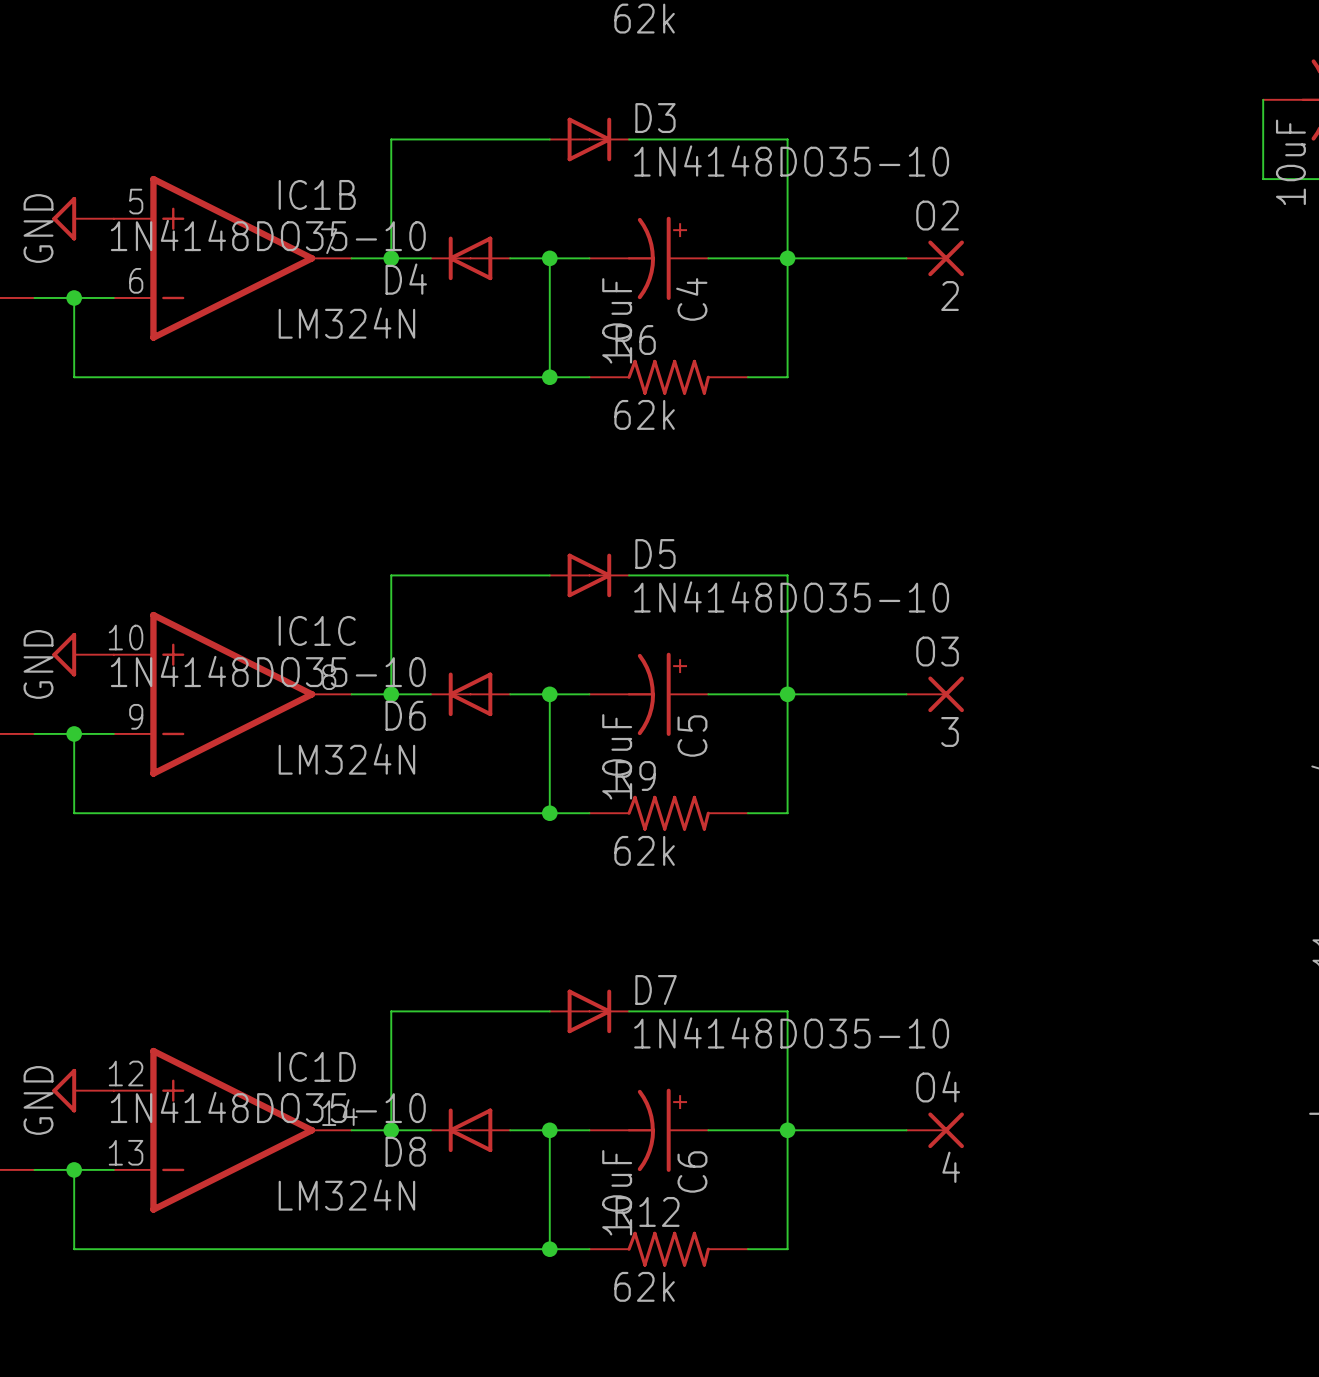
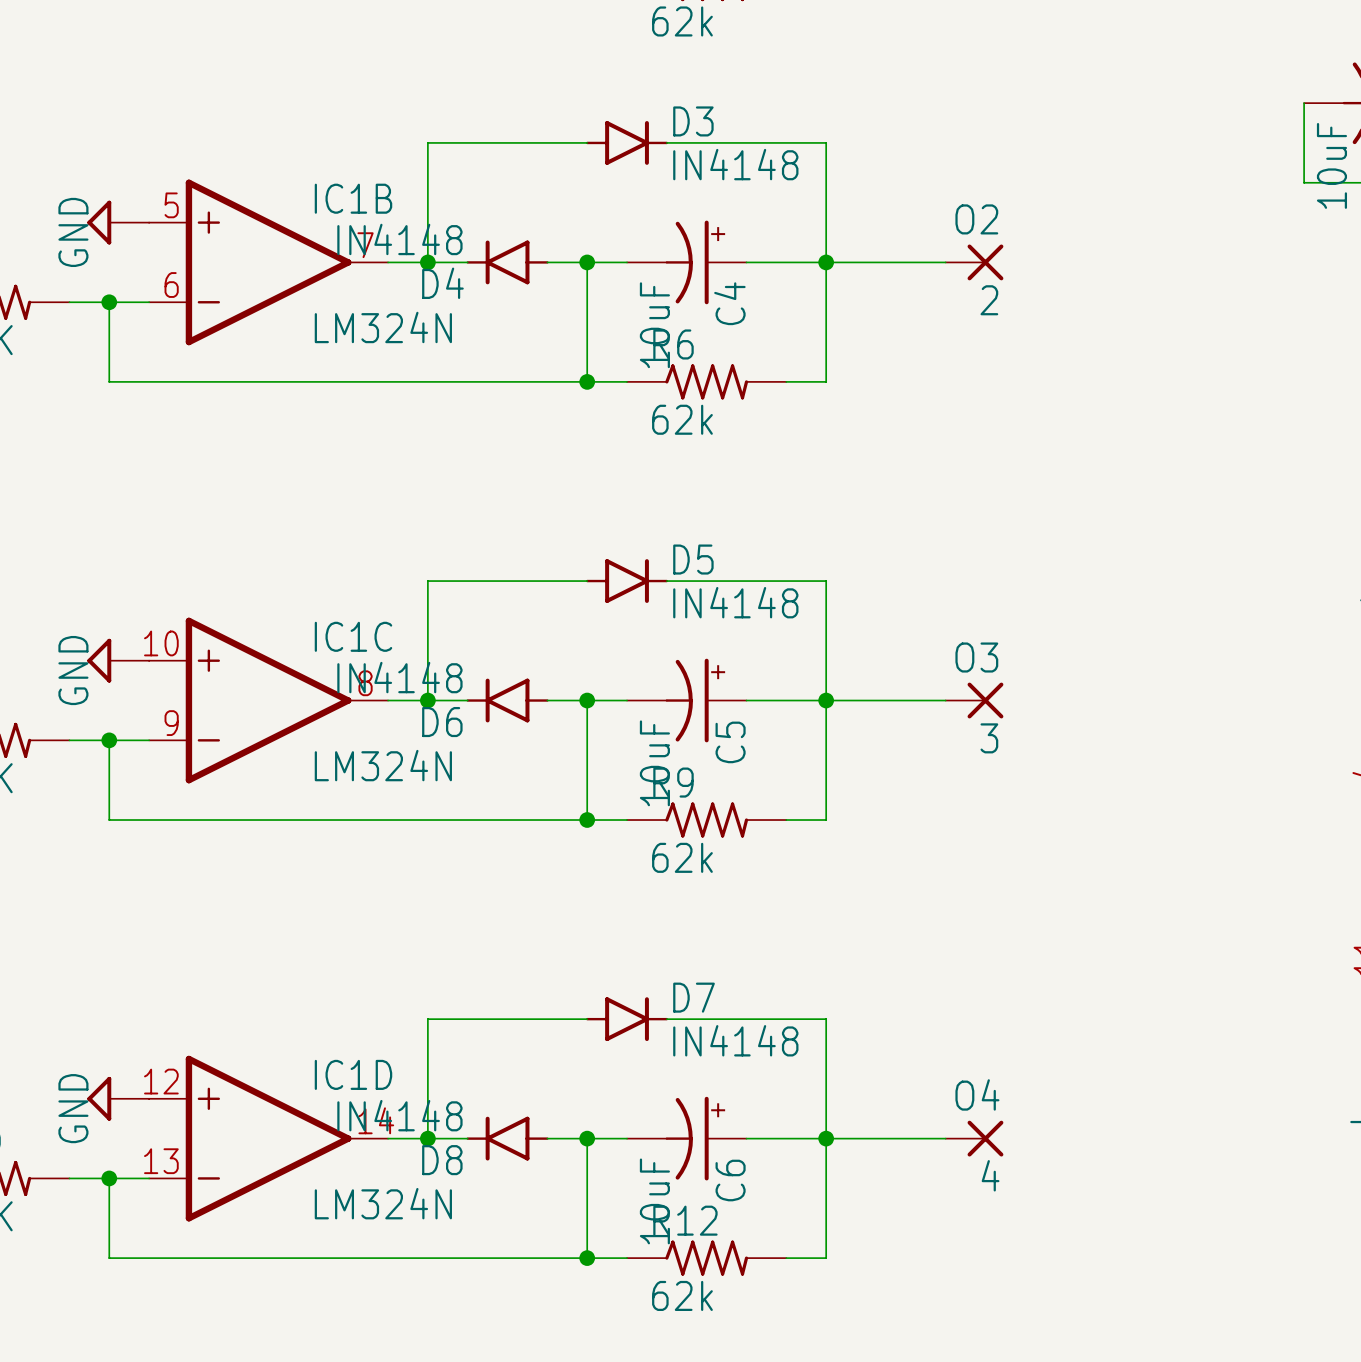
D3 symbol: [549, 117, 630, 162] -> [586, 121, 669, 165]
D3 value: 1N4148DO35-10 (791, 160) -> IN4148 (735, 164)
D4 value: 1N4148DO35-10 (268, 235) -> IN4148 (399, 239)
D4 symbol: [430, 236, 511, 281] -> [466, 240, 549, 285]
D5 symbol: [549, 553, 630, 598] -> [586, 559, 669, 603]
D5 value: 1N4148DO35-10 (791, 596) -> IN4148 (735, 602)
D6 value: 1N4148DO35-10 (268, 671) -> IN4148 (399, 677)
D6 symbol: [430, 672, 511, 717] -> [466, 678, 549, 723]
D7 symbol: [549, 989, 630, 1034] -> [586, 997, 669, 1042]
D7 value: 1N4148DO35-10 (791, 1032) -> IN4148 (735, 1040)
D8 value: 1N4148DO35-10 (268, 1107) -> IN4148 (399, 1115)
D8 symbol: [430, 1108, 511, 1153] -> [466, 1116, 549, 1161]

